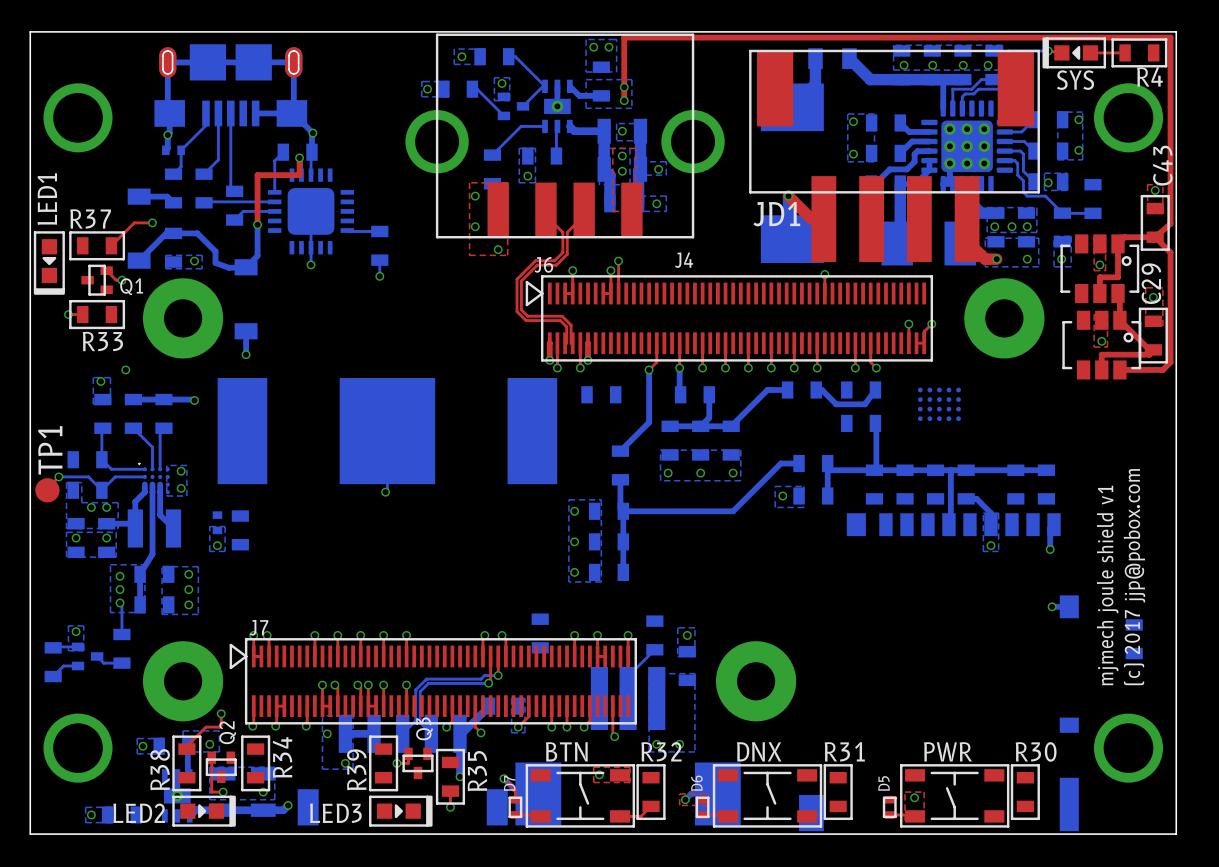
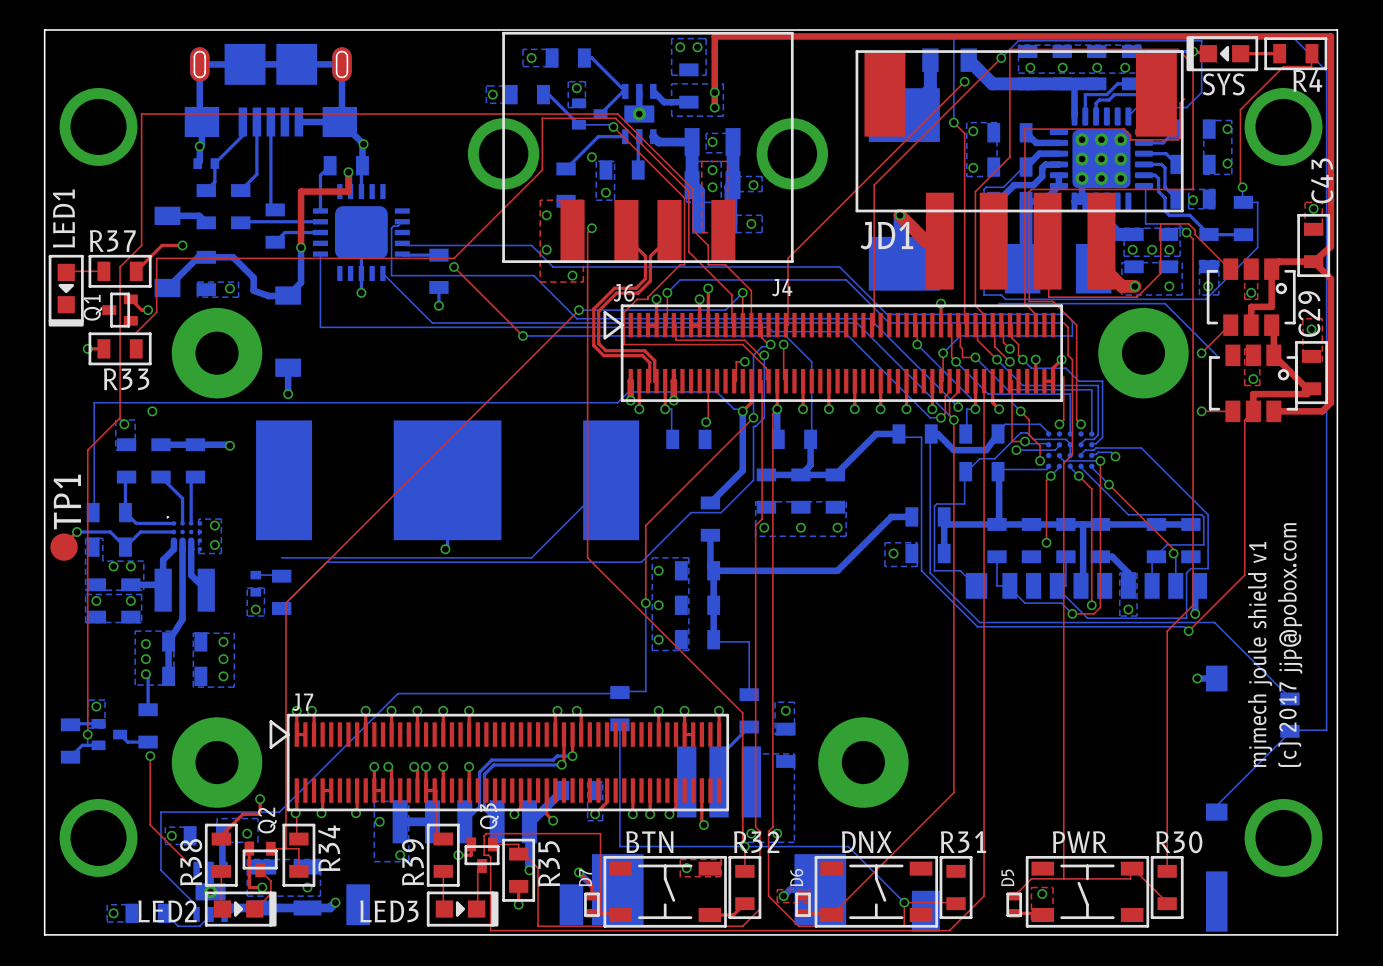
top track: none -> (1311, 53) (1311, 66) (1283, 66) (1240, 109) (1240, 185) (1242, 187)
bottom track: none -> (1001, 58) (1018, 40) (1201, 40) (1201, 92) (1186, 107) (1137, 107) (1128, 116)
top track: none -> (1001, 58) (874, 185) (874, 325) (872, 325)
via: none -> (1001, 58)
top track: none -> (964, 81) (787, 258) (787, 325) (785, 325)
via: none -> (964, 81)
top track: none -> (1184, 98) (1180, 103) (1180, 137) (1177, 139) (1130, 139) (1130, 135) (1124, 129) (1024, 129) (1024, 303) (1035, 314) (1035, 325)
bottom track: none -> (953, 122) (953, 36) (1292, 36) (1326, 70) (1326, 730) (1289, 730) (1289, 732) (1216, 805) (1216, 812)
top track: none -> (953, 122) (964, 133) (964, 323) (966, 325)
via: none -> (953, 122)
bottom track: none -> (578, 124) (611, 124) (613, 126)
top track: none -> (613, 126) (684, 198) (684, 264) (680, 264) (647, 299) (637, 299) (624, 312) (624, 344) (742, 344) (766, 368) (766, 379) (768, 381)
via: none -> (613, 126)
via: none -> (591, 157)
bottom track: none -> (1026, 167) (1022, 167) (1003, 187) (986, 187) (984, 189) (984, 295) (1001, 295) (1005, 299) (1205, 299) (1257, 247) (1257, 202) (1242, 202) (1242, 187)
bottom track: none -> (1144, 185) (1145, 187) (1145, 223) (1177, 223) (1186, 232)
via: none -> (1242, 187)
bottom track: none -> (402, 221) (391, 228) (391, 275) (533, 275) (576, 318) (869, 318) (958, 407)
top track: none -> (591, 228) (587, 232) (587, 557) (742, 712) (742, 844) (744, 846) (744, 871)
via: none -> (591, 228)
top track: none -> (1186, 232) (1193, 238) (1193, 605) (1167, 631) (1167, 871)
via: none -> (1186, 232)
top track: none -> (1047, 241) (1048, 297) (1137, 297) (1160, 273) (1160, 223) (1188, 223) (1195, 230) (1195, 234) (1230, 269)
bottom track: none -> (402, 243) (404, 245) (531, 245) (553, 267) (839, 267) (887, 314) (1065, 314) (1072, 320) (1072, 335) (960, 335) (943, 353)
bottom track: none -> (320, 254) (320, 327) (768, 327) (772, 331) (844, 331) (930, 417) (940, 417)
top track: none -> (454, 267) (522, 335)
via: none -> (454, 267)
top track: none -> (103, 271) (66, 272)
bottom track: none -> (382, 273) (432, 323) (856, 323) (953, 419)
bottom track: none -> (667, 292) (680, 279) (846, 279) (889, 323) (1063, 323)
top track: none -> (667, 292) (667, 325) (665, 325)
via: none -> (667, 292)
bottom track: none -> (742, 292) (725, 310) (578, 310)
top track: none -> (742, 292) (742, 325)
via: none -> (742, 292)
bottom track: none -> (999, 303) (1165, 303) (1216, 355)
top track: none -> (578, 310) (285, 603) (285, 848)
via: none -> (578, 310)
Q1 name rotation: 0° (131, 286) -> 90° counterclockwise (92, 307)
Q1 name position: Q1 (131, 286) -> Q1 (92, 307)
top track: none -> (1063, 323) (1068, 327) (1068, 355) (1072, 359) (1072, 454) (1063, 463) (1063, 878)
top track: none -> (673, 325) (675, 325) (675, 340) (744, 340) (759, 355) (764, 355)
top track: none -> (734, 325) (731, 323) (731, 295) (688, 251) (688, 191) (615, 118) (542, 118) (542, 170) (454, 258) (156, 258) (156, 312) (135, 333)
top track: none -> (751, 325) (751, 290) (725, 264) (708, 264) (708, 245) (693, 230) (693, 189) (617, 114) (141, 114) (141, 245) (120, 267) (120, 417) (87, 450) (87, 734)
top track: none -> (760, 325) (762, 325) (762, 338) (770, 344)
top track: none -> (915, 325) (917, 325) (917, 344)
top track: none -> (949, 325) (951, 325) (951, 357) (956, 361)
top track: none -> (958, 325) (960, 325) (962, 357) (975, 357)
top track: none -> (975, 325) (977, 325) (977, 340) (996, 359)
top track: none -> (984, 325) (984, 314) (975, 305) (975, 191) (1009, 157) (1009, 49) (1177, 49) (1193, 64) (1193, 189) (1031, 189) (1029, 191) (1029, 301) (1052, 301) (1076, 325) (1076, 419) (1081, 424)
top track: none -> (992, 325) (994, 325) (994, 346) (1009, 361)
top track: none -> (1001, 325) (1003, 325) (1003, 342) (1009, 348)
top track: none -> (1009, 325) (1012, 325) (1012, 338) (1018, 344) (1018, 355) (1022, 359)
top track: none -> (1230, 325) (1201, 353)
bottom track: none -> (522, 335) (785, 335) (811, 361) (810, 439)
via: none -> (522, 335)
bottom track: none -> (770, 344) (768, 346) (762, 346) (753, 355) (753, 417)
via: none -> (770, 344)
top track: none -> (783, 344) (783, 379) (785, 381)
via: none -> (783, 344)
bottom track: none -> (917, 344) (973, 400) (1009, 400) (1020, 411)
via: none -> (917, 344)
via: none -> (1009, 348)
top track: none -> (943, 353) (943, 381) (941, 381)
via: none -> (943, 353)
via: none -> (1201, 353)
bottom track: none -> (764, 355) (764, 417) (753, 426) (753, 480) (721, 512) (691, 512) (641, 562) (326, 562) (281, 608)
via: none -> (764, 355)
bottom track: none -> (975, 357) (1007, 389) (1091, 389) (1091, 433)
via: none -> (975, 357)
bottom track: none -> (996, 359) (1022, 385) (1098, 385) (1098, 435) (1093, 439) (1085, 439) (1081, 444)
via: none -> (996, 359)
bottom track: none -> (1022, 359) (1031, 368) (1065, 368) (1078, 381) (1102, 381) (1102, 437) (1096, 443) (1091, 444)
via: none -> (1022, 359)
top track: none -> (744, 361) (736, 361) (736, 381) (734, 381)
via: none -> (744, 361)
bottom track: none -> (956, 361) (988, 394) (1070, 394) (1070, 433)
via: none -> (956, 361)
via: none -> (1009, 361)
top track: none -> (1063, 376) (1063, 419) (1059, 424)
top track: none -> (708, 381) (708, 419) (706, 422)
top track: none -> (760, 381) (762, 381) (762, 519) (755, 525) (755, 827) (759, 831) (759, 909) (742, 926) (538, 926) (538, 868) (518, 848)
top track: none -> (949, 381) (949, 391) (945, 396) (945, 413) (940, 417)
top track: none -> (958, 381) (958, 391) (949, 400) (949, 415) (953, 419) (953, 792) (831, 914)
top track: none -> (984, 381) (984, 896) (949, 930) (490, 930) (490, 857) (484, 855) (484, 835) (486, 833) (600, 833) (600, 913)
top track: none -> (1009, 381) (1012, 381) (1012, 441) (1024, 441)
via: none -> (958, 407)
bottom track: none -> (665, 409) (671, 409) (672, 439)
top track: none -> (777, 409) (772, 413) (772, 827) (768, 831) (768, 896) (798, 926) (904, 926) (904, 902) (956, 903)
bottom track: none -> (975, 409) (966, 409) (965, 433)
bottom track: none -> (742, 411) (740, 409) (734, 409) (716, 391) (628, 391) (617, 402) (94, 402) (93, 512)
top track: none -> (1020, 411) (1029, 419) (1029, 435) (1040, 445) (1040, 460)
via: none -> (1020, 411)
top track: none -> (1201, 411) (1232, 411)
via: none -> (1201, 411)
top track: none -> (1253, 411) (1244, 419) (1244, 575) (1188, 631)
top track: none -> (753, 417) (645, 525) (645, 603)
via: none -> (753, 417)
via: none -> (940, 417)
via: none -> (953, 419)
via: none -> (706, 422)
via: none -> (1059, 424)
via: none -> (1081, 424)
bottom track: none -> (898, 433) (900, 437) (921, 437) (921, 570) (977, 626) (1184, 626) (1188, 631)
bottom track: none -> (931, 433) (930, 572) (979, 622) (1214, 622) (1289, 698)
bottom track: none -> (998, 433) (1005, 424) (1040, 424) (1048, 433)
bottom track: none -> (1024, 441) (1027, 443) (1048, 444)
via: none -> (1024, 441)
bottom track: none -> (1059, 444) (1055, 450) (1016, 450)
via: none -> (1016, 450)
bottom track: none -> (1059, 455) (1063, 460) (1100, 460)
bottom track: none -> (1070, 455) (1070, 443) (1065, 439) (1033, 439) (1027, 432) (1020, 432) (994, 458) (979, 458) (964, 471) (964, 504) (936, 504) (934, 506) (934, 570) (960, 570) (976, 585)
bottom track: none -> (1081, 455) (1085, 450) (1093, 450) (1096, 447) (1141, 447) (1208, 514) (1208, 568) (1190, 568) (1186, 572) (1186, 618) (1087, 618) (1057, 588) (1057, 585) (1065, 585) (1065, 556)
bottom track: none -> (1091, 455) (1098, 452) (1111, 452) (1115, 456)
via: none -> (1115, 456)
via: none -> (1040, 460)
top track: none -> (1100, 460) (1100, 607) (1093, 613) (1072, 613)
via: none -> (1100, 460)
bottom track: none -> (1048, 466) (1046, 469) (1001, 469) (998, 471)
bottom track: none -> (1059, 466) (1050, 475)
bottom track: none -> (1070, 466) (1078, 475)
bottom track: none -> (1081, 466) (1128, 514) (1201, 514) (1203, 516) (1203, 544) (1167, 544) (1156, 557) (1152, 557) (1152, 585)
bottom track: none -> (1091, 466) (1109, 484)
top track: none -> (1050, 475) (1046, 480) (1046, 542)
via: none -> (1050, 475)
top track: none -> (1078, 475) (1091, 488) (1091, 605)
via: none -> (1078, 475)
bottom track: none -> (611, 480) (531, 557) (281, 557)
top track: none -> (1109, 484) (1173, 549) (1173, 553)
via: none -> (1109, 484)
via: none -> (1046, 542)
bottom track: none -> (1173, 553) (1175, 555) (1175, 585)
via: none -> (1173, 553)
bottom track: none -> (996, 556) (996, 585) (1009, 585) (1024, 603) (1061, 603) (1072, 613)
bottom track: none -> (255, 575) (281, 575)
bottom track: none -> (645, 603) (645, 691) (619, 691) (619, 693) (398, 693) (279, 812) (161, 812) (161, 870) (195, 904) (196, 914)
via: none -> (645, 603)
via: none -> (1091, 605)
via: none -> (1072, 613)
via: none -> (1188, 631)
bottom track: none -> (713, 639) (714, 641) (749, 641) (749, 694)
bottom track: none -> (619, 724) (619, 846) (848, 846) (904, 902)
bottom track: none -> (87, 734) (87, 745)
via: none -> (87, 734)
top track: none -> (150, 756) (150, 825) (184, 859)
via: none -> (150, 756)
top track: none -> (434, 790) (436, 790) (436, 831) (443, 839)
top track: none -> (295, 813) (296, 835) (298, 839)
top track: none -> (492, 844) (518, 844) (518, 854)
via: none -> (744, 846)
top track: none -> (270, 848) (298, 848) (298, 871)
top track: none -> (482, 865) (477, 870) (476, 909)
top track: none -> (260, 870) (270, 881) (270, 893) (254, 909)
top track: none -> (221, 871) (222, 909)
top track: none -> (443, 871) (444, 909)
top track: none -> (1014, 896) (1031, 878) (1130, 878) (1130, 870) (1132, 868) (1167, 903)
via: none -> (904, 902)
bottom track: none -> (164, 913) (178, 926) (199, 926) (210, 914)

